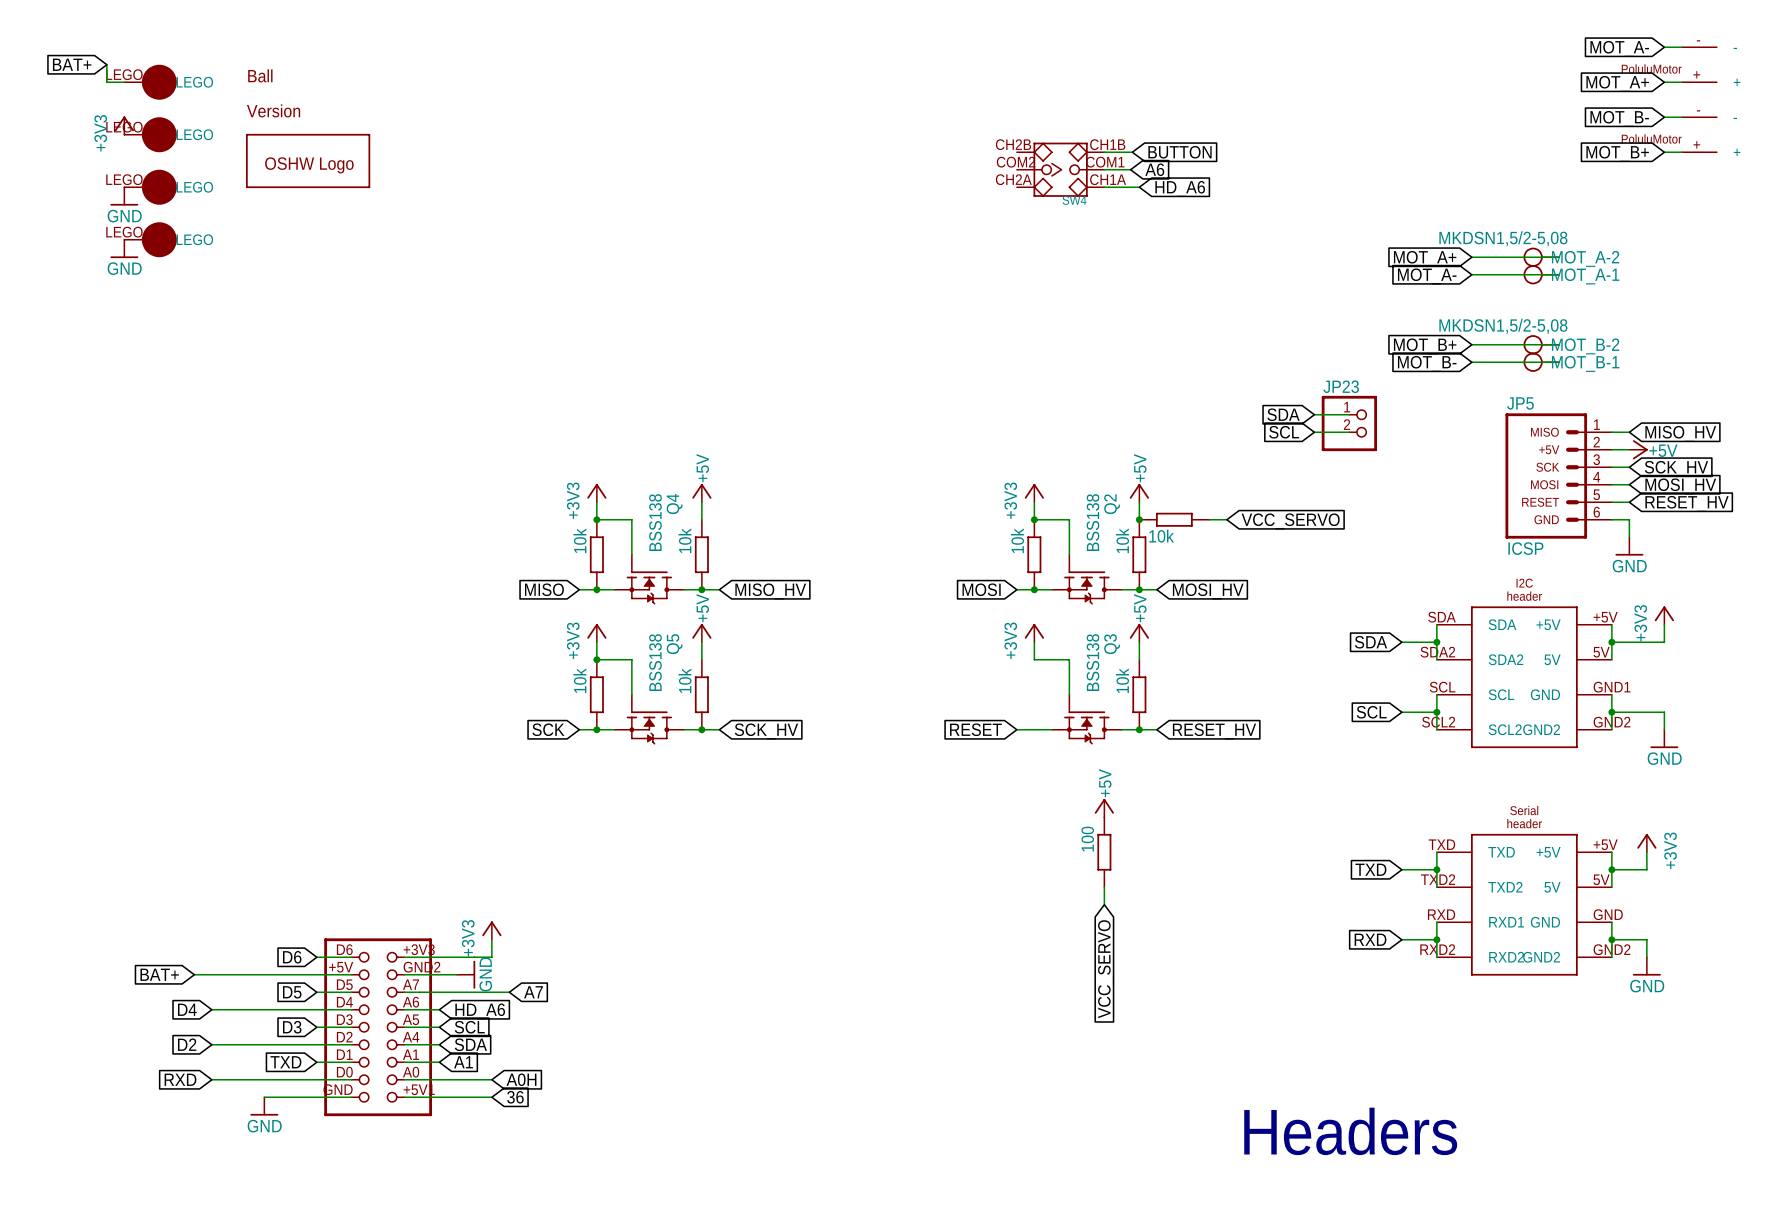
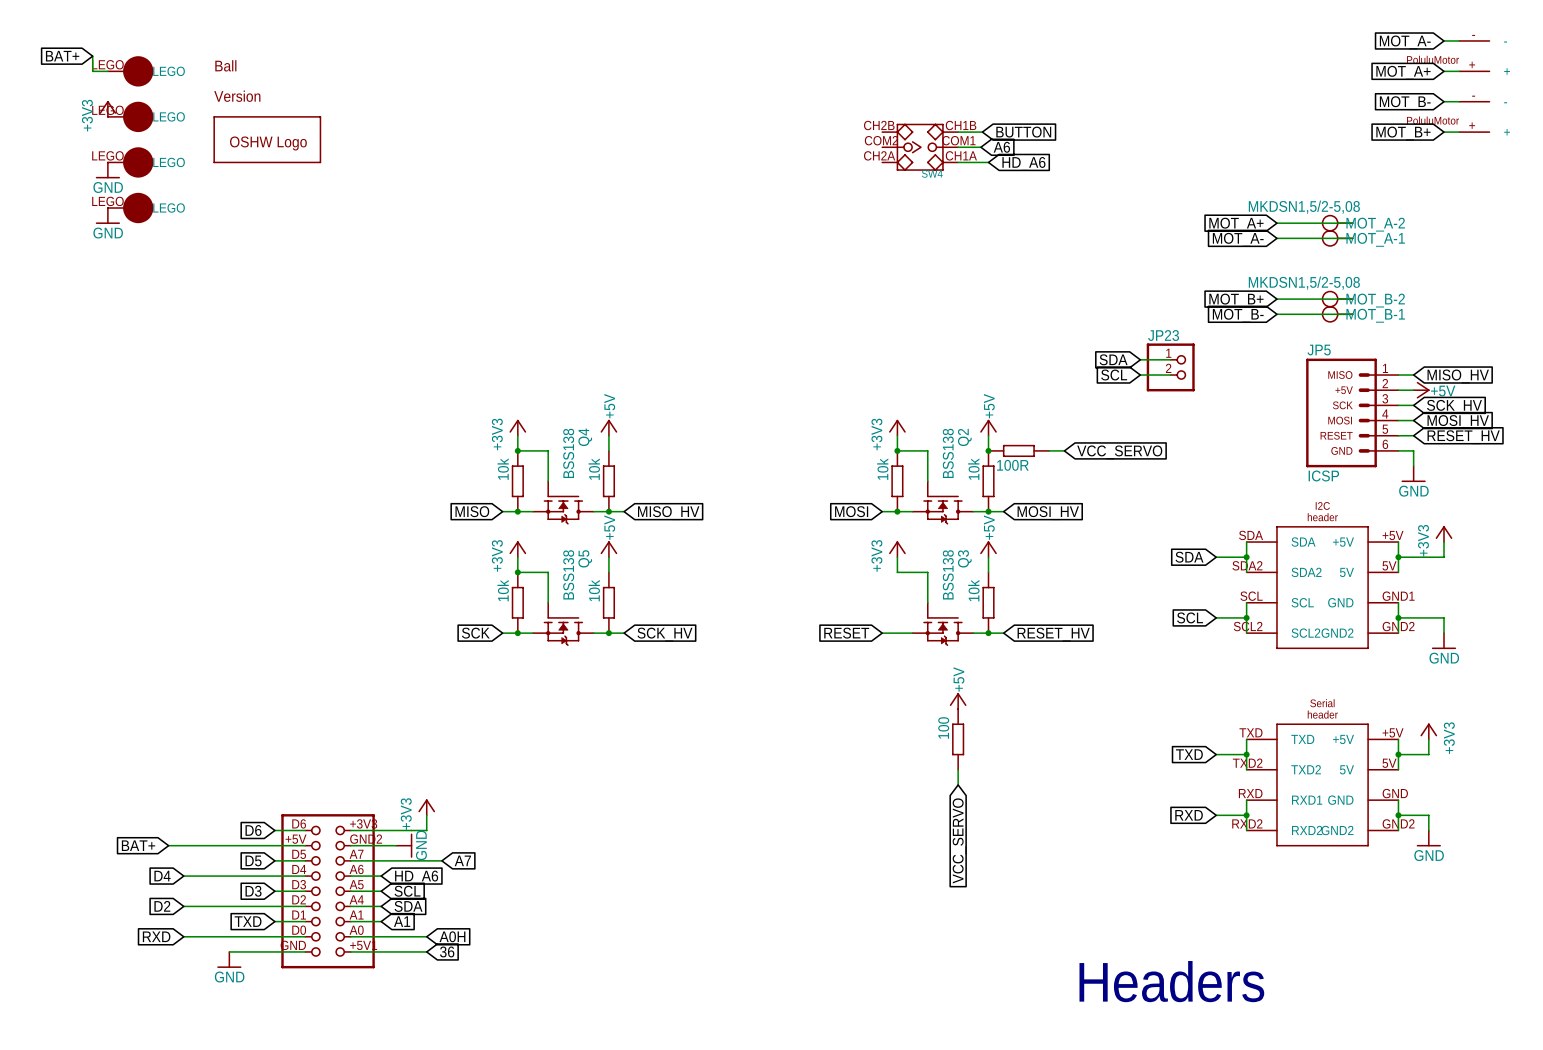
part value: 10k (1161, 536) -> 100R (1012, 465)

